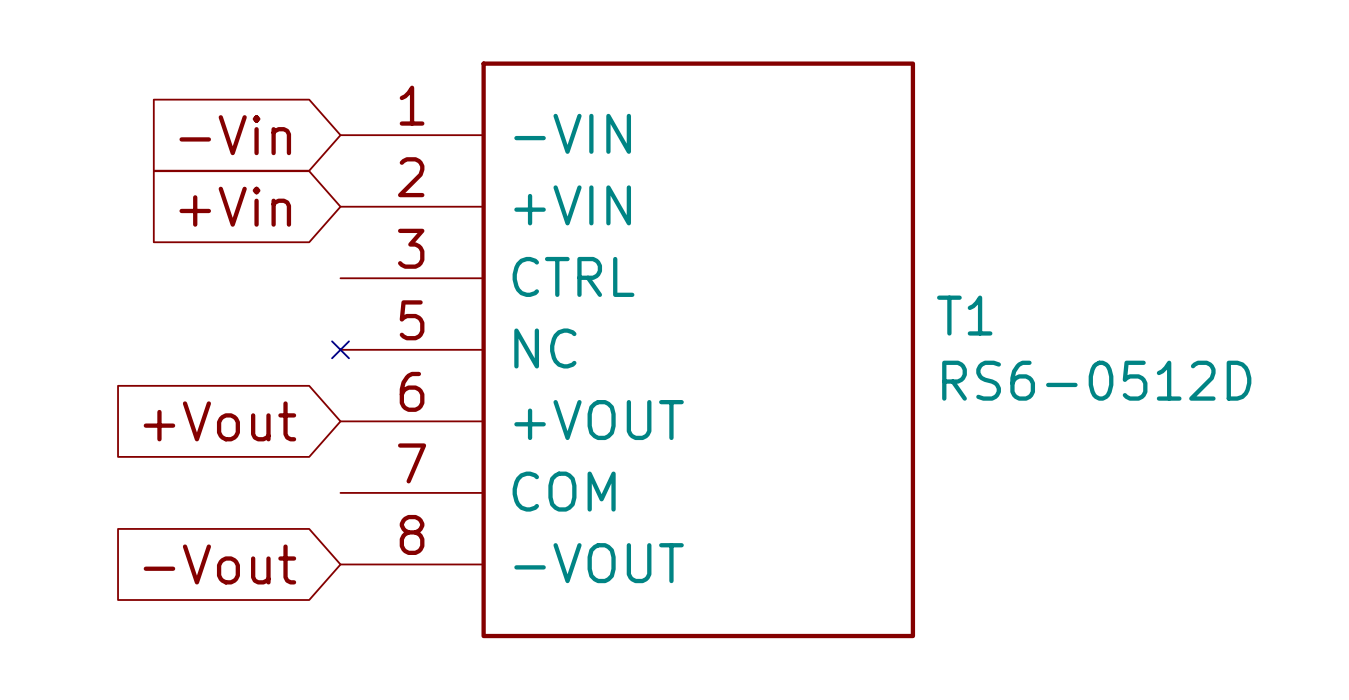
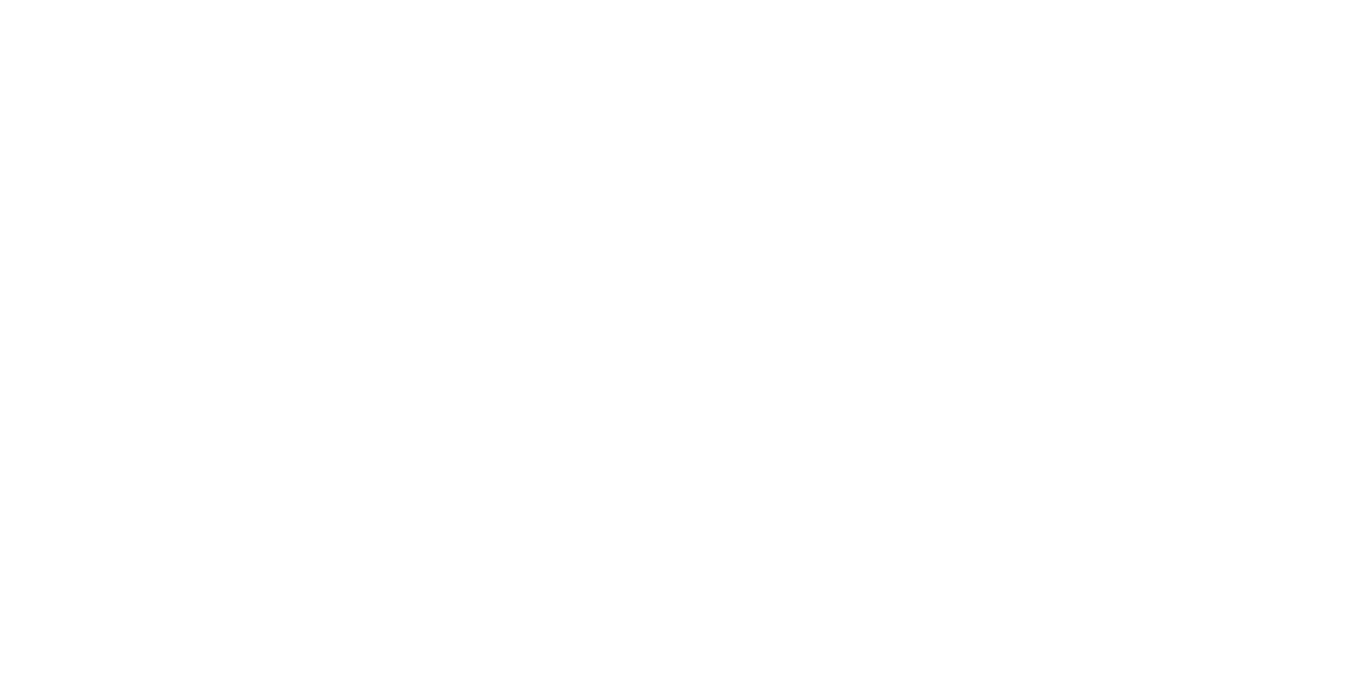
global label: -Vin (235, 135) -> none
global label: +Vin (235, 206) -> none
T1: RS6-0512D (623, 349) -> none
global label: +Vout (219, 421) -> none
global label: -Vout (219, 564) -> none

